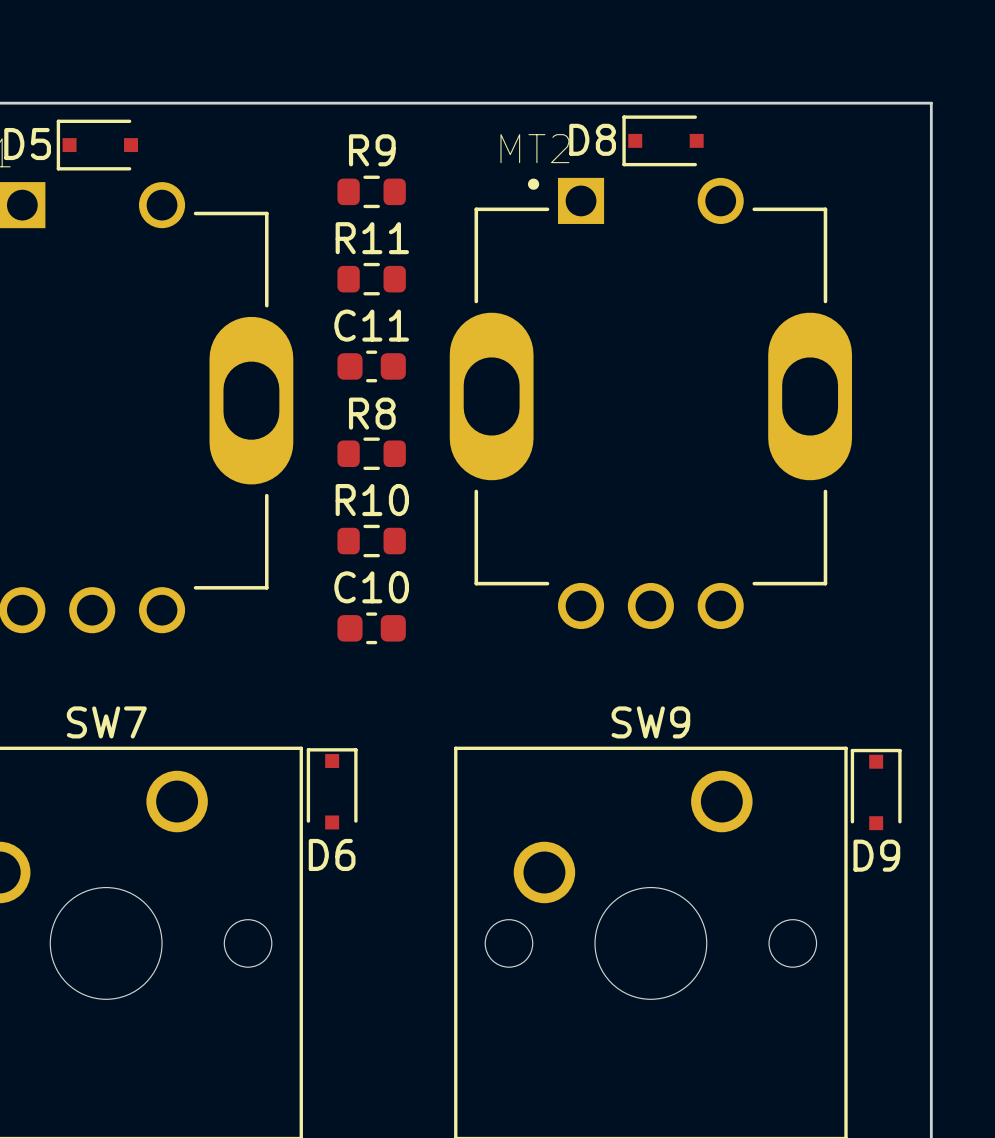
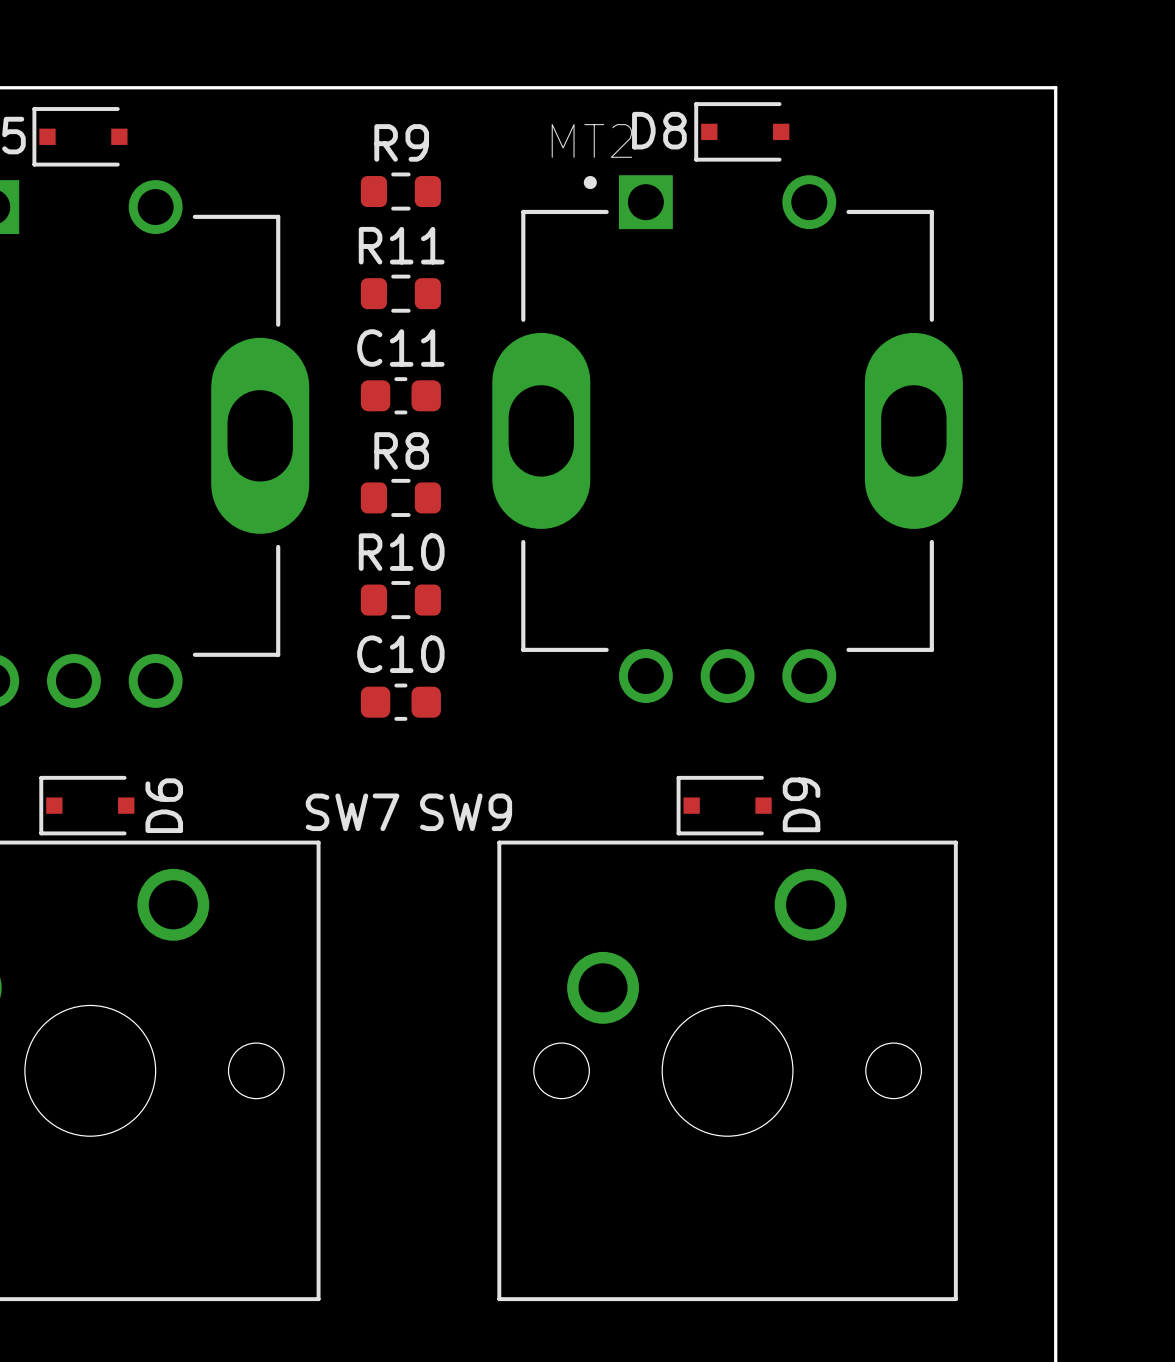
SW7 name position: SW7 (106, 722) -> SW7 (352, 812)
SW9 name position: SW9 (650, 722) -> SW9 (466, 812)
D6 rotation: 0° (332, 788) -> 90° counterclockwise (86, 805)
D6 position: (332, 788) -> (86, 805)
D9 rotation: 0° (876, 789) -> 90° counterclockwise (724, 805)
D9 position: (876, 789) -> (724, 805)

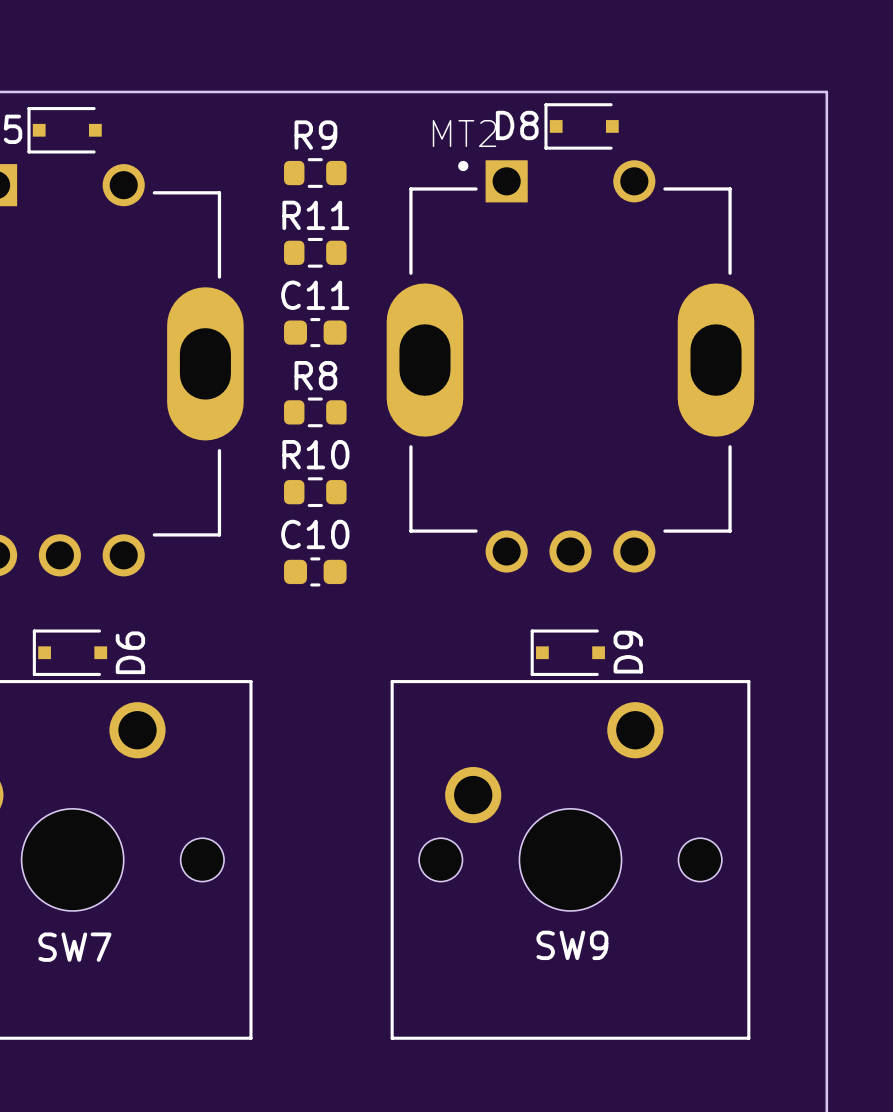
SW7 name position: SW7 (352, 812) -> SW7 (74, 947)
SW9 name position: SW9 (466, 812) -> SW9 (572, 945)

